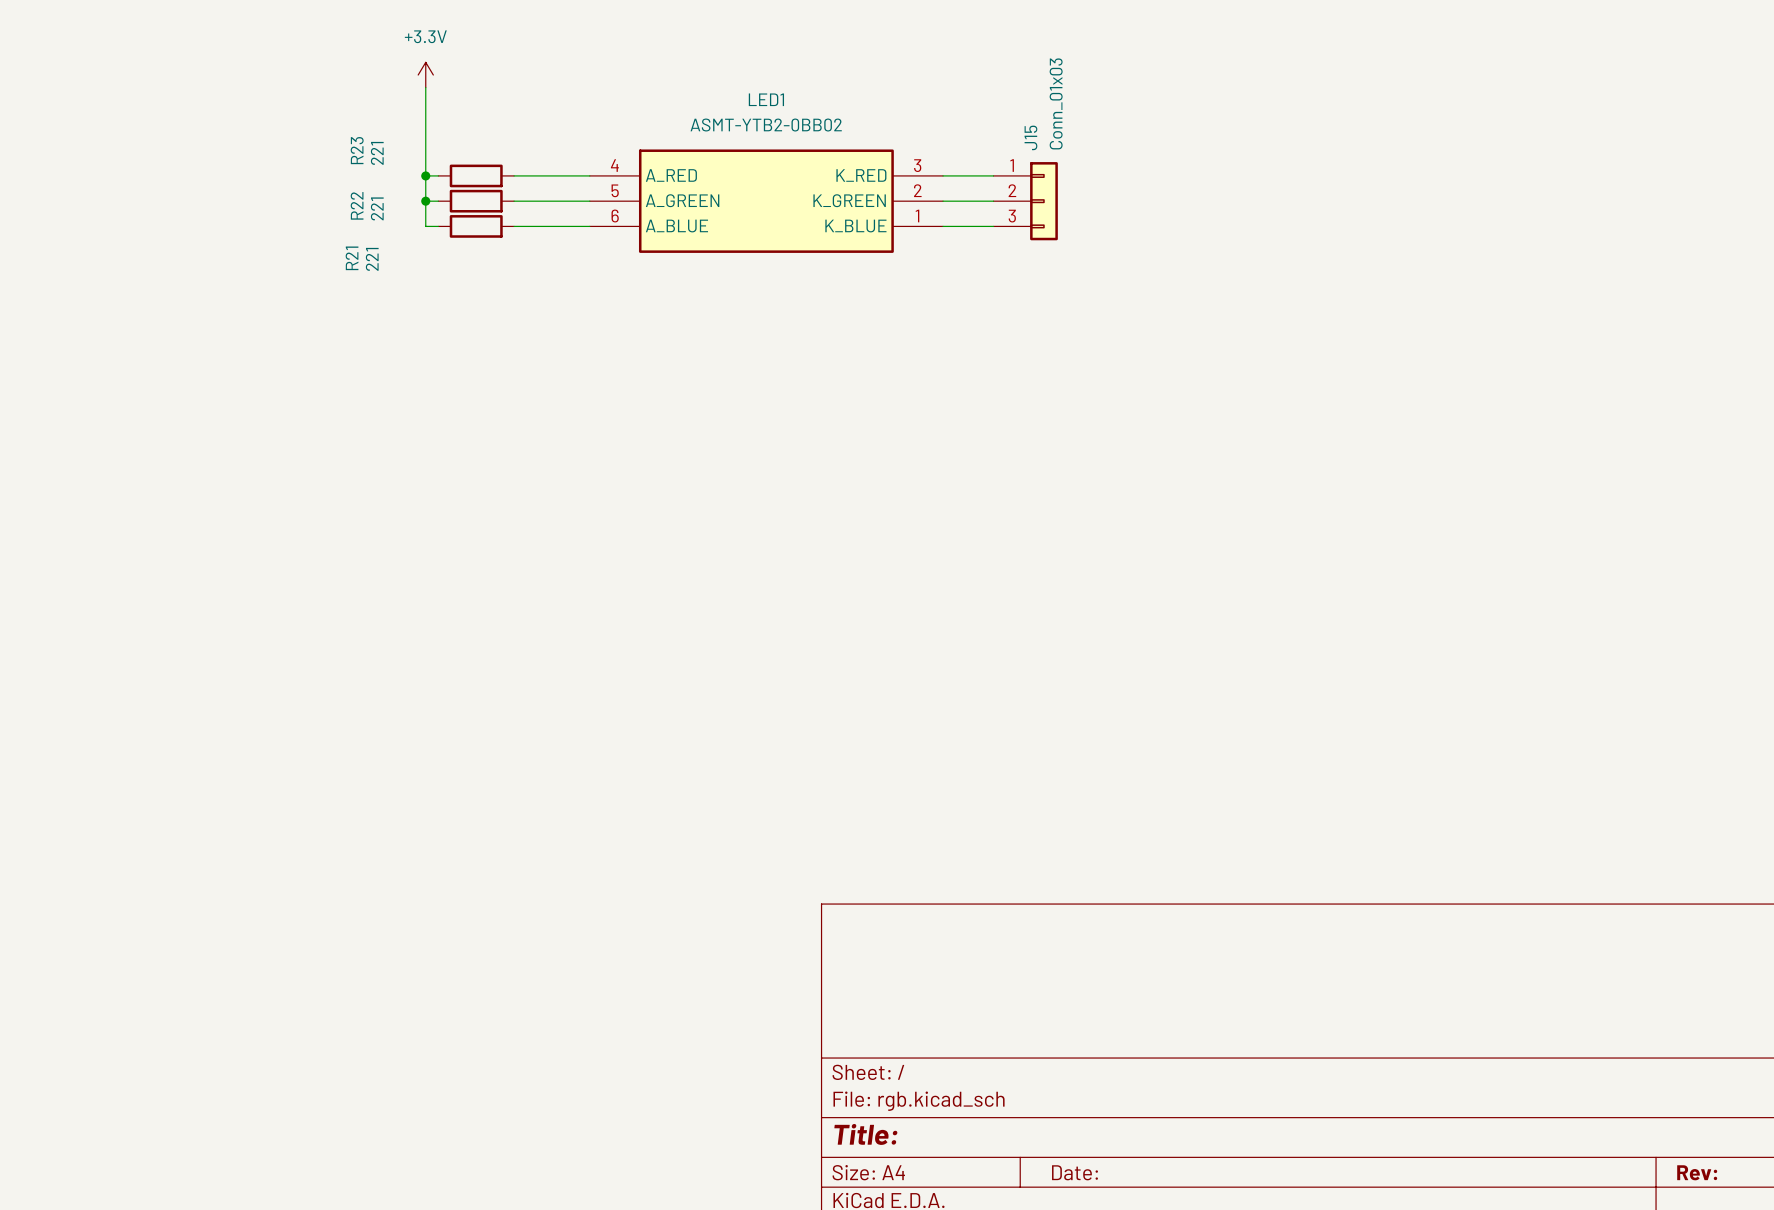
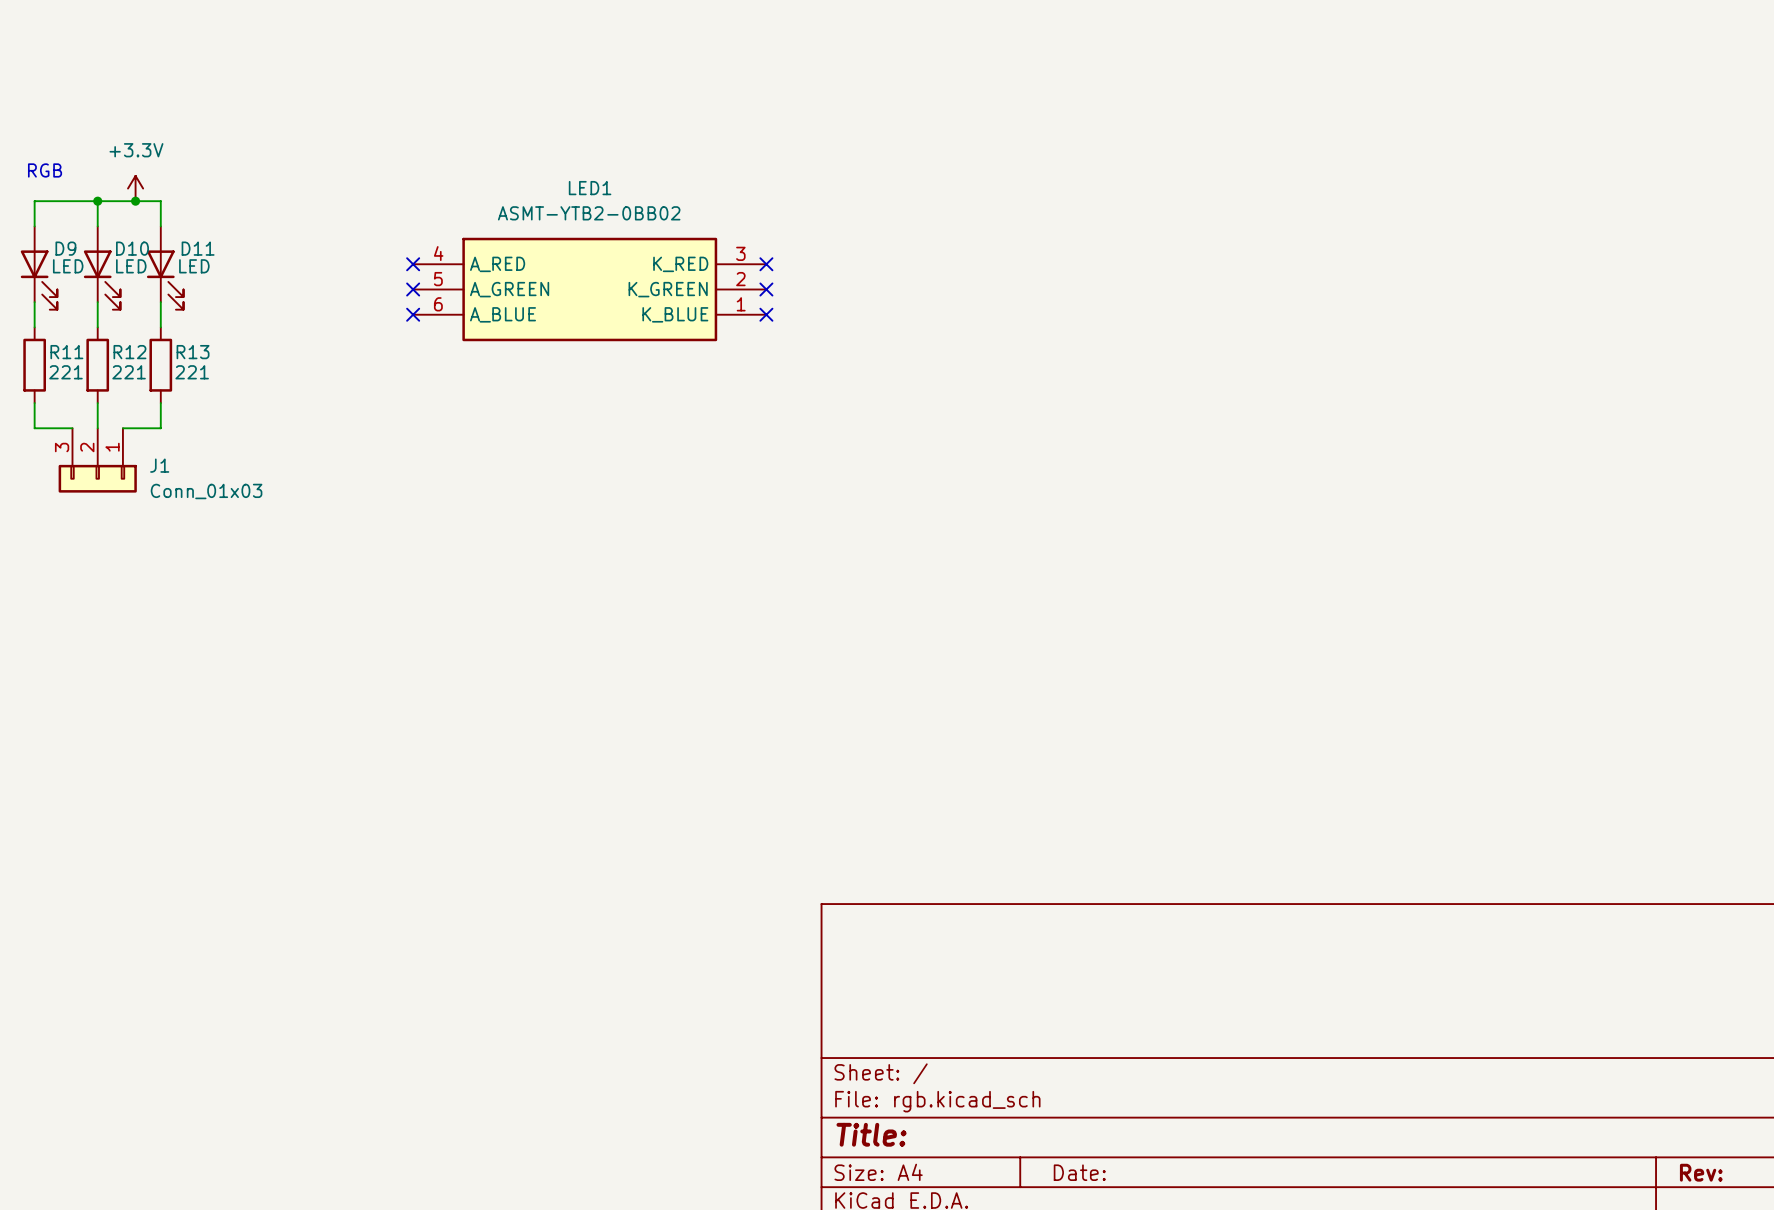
power symbol: +3.3V (425, 75) -> none
wire: (425, 87) (425, 226) (438, 226) -> none
text: none -> RGB (45, 170)
wire: (425, 175) (438, 175) -> none
junction: (425, 175) -> none
R23: 221 (476, 175) -> none
wire: (514, 175) (589, 175) -> none
wire: (943, 175) (993, 175) -> none
power symbol: none -> +3.3V (135, 188)
wire: none -> (97, 201) (97, 226)
junction: none -> (97, 201)
junction: none -> (135, 201)
wire: (425, 201) (438, 201) -> none
junction: (425, 201) -> none
R22: 221 (476, 201) -> none
wire: (514, 201) (589, 201) -> none
LED1 position: (766, 201) -> (589, 289)
wire: (943, 201) (993, 201) -> none
J15: Conn_01x03 (1025, 201) -> none
wire: none -> (34, 226) (34, 201) (160, 201) (160, 226)
R21: 221 (476, 226) -> none
wire: (514, 226) (589, 226) -> none
wire: (943, 226) (993, 226) -> none
no-connect mark: none -> (413, 264)
no-connect mark: none -> (766, 264)
D9: none -> LED (39, 268)
D10: none -> LED (102, 268)
D11: none -> LED (165, 268)
no-connect mark: none -> (413, 289)
no-connect mark: none -> (766, 289)
wire: none -> (34, 302) (34, 327)
wire: none -> (97, 302) (97, 327)
wire: none -> (160, 302) (160, 327)
no-connect mark: none -> (413, 314)
no-connect mark: none -> (766, 314)
R11: none -> 221 (34, 365)
R12: none -> 221 (97, 365)
R13: none -> 221 (160, 365)
wire: none -> (34, 403) (34, 428) (72, 428)
wire: none -> (97, 403) (97, 428)
wire: none -> (160, 403) (160, 428) (122, 428)
J1: none -> Conn_01x03 (97, 460)

